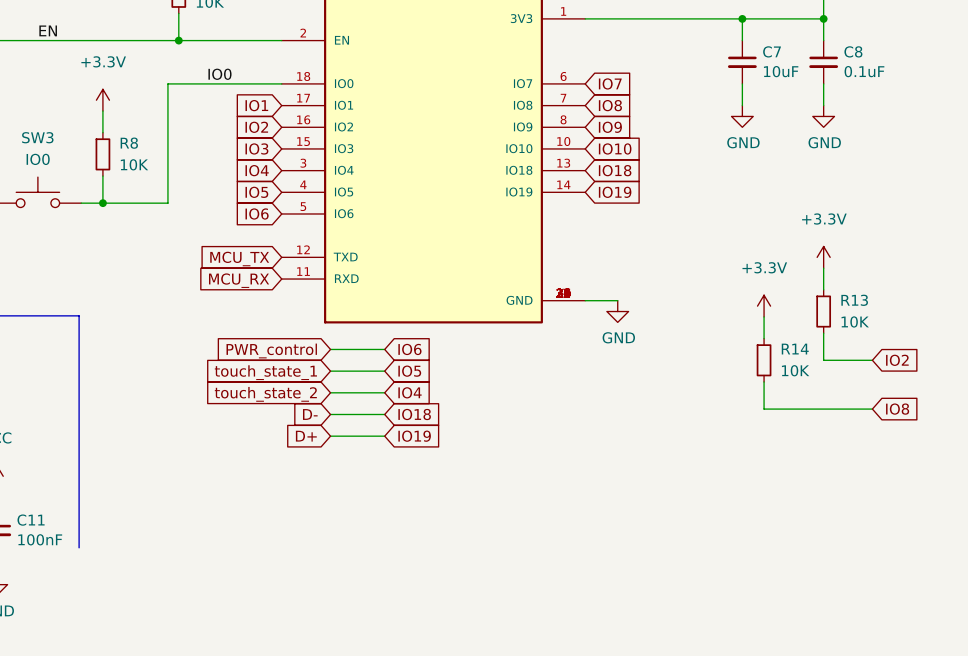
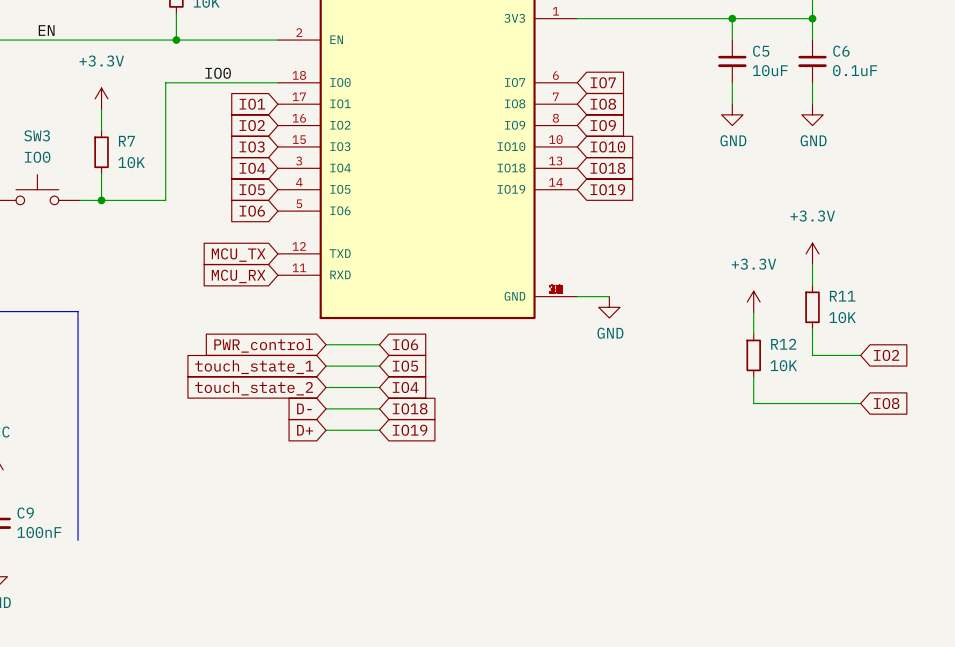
C7 name: C7 (772, 51) -> C5 (761, 51)
C8 name: C8 (853, 51) -> C6 (841, 51)
R8 name: R8 (129, 143) -> R7 (126, 141)
R13 name: R13 (854, 300) -> R11 (842, 296)
R14 name: R14 (795, 349) -> R12 (783, 344)
C11 name: C11 (31, 520) -> C9 (25, 513)

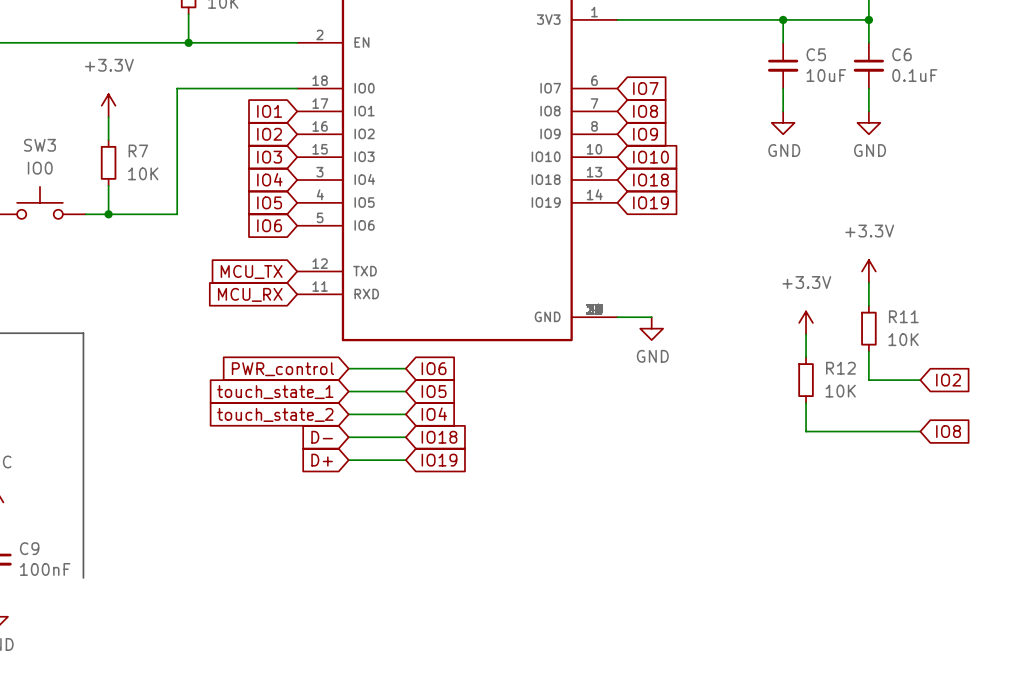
label: EN (46, 30) -> none
label: IO0 (218, 73) -> none

